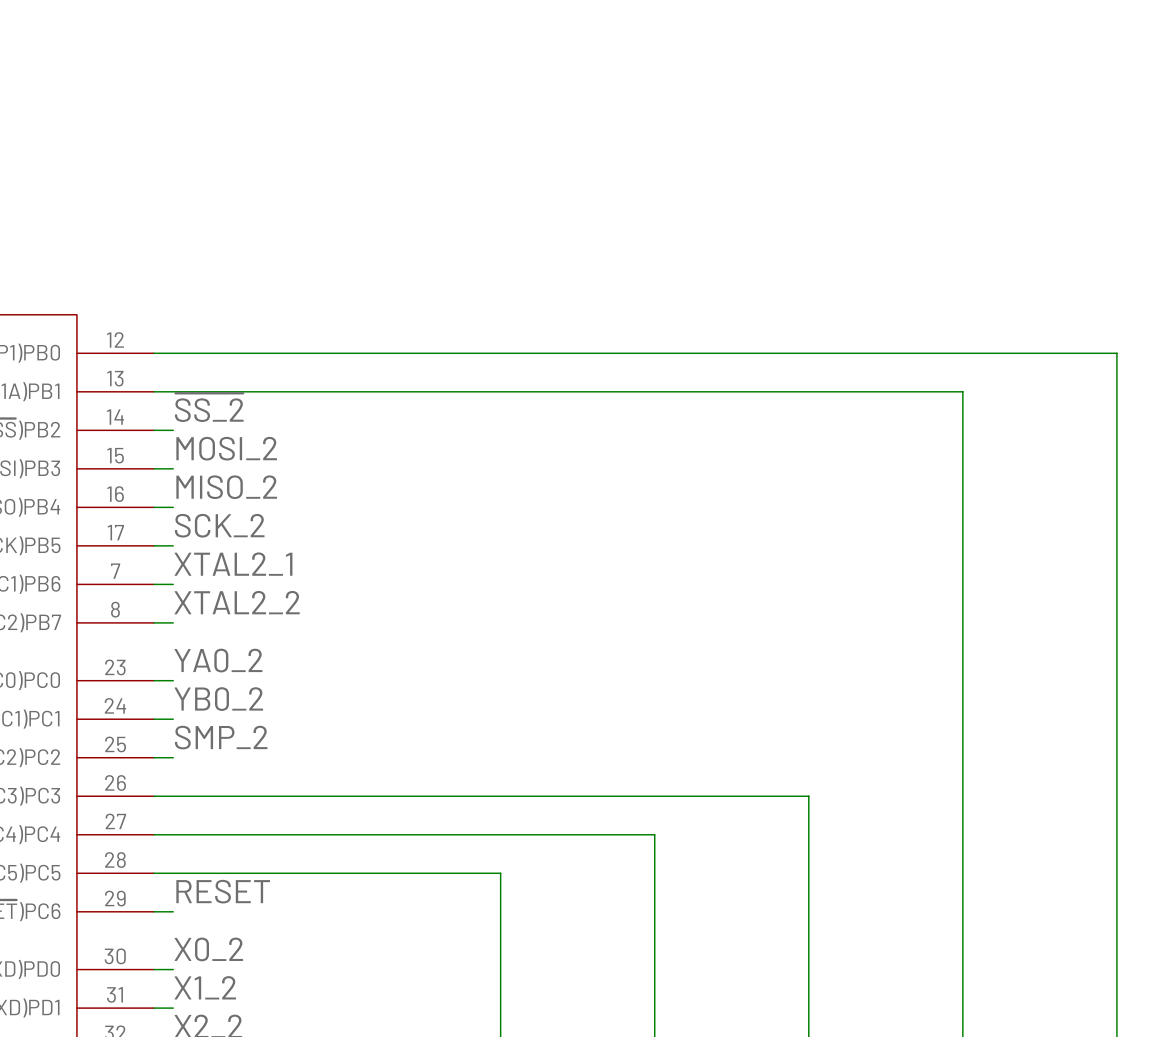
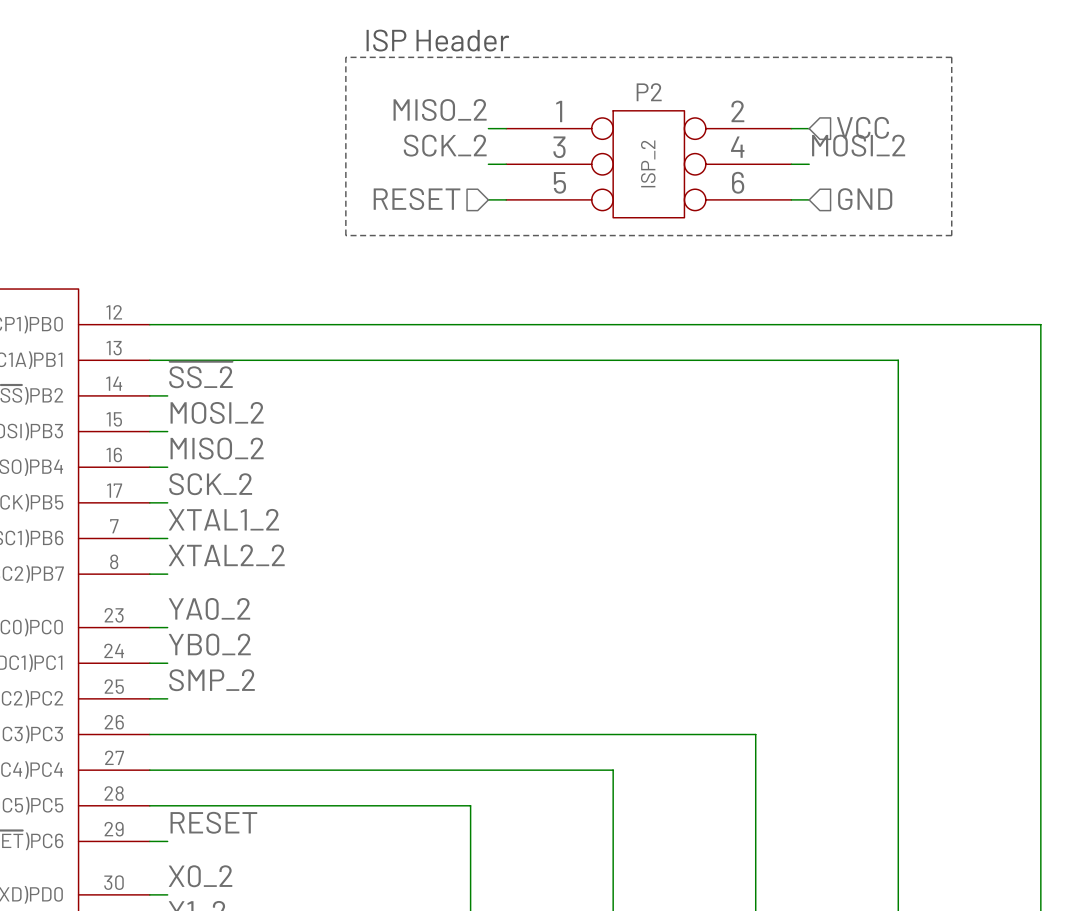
text: none -> ISP Header (437, 40)
line: none -> (345, 57) (951, 57) (951, 235) (345, 235) (345, 57)
label: none -> MISO_2 (440, 109)
hierarchical label: none -> VCC (862, 127)
wire: none -> (488, 128) (506, 128)
wire: none -> (791, 128) (809, 128)
label: none -> SCK_2 (445, 145)
label: none -> MOSI_2 (858, 145)
wire: none -> (488, 164) (506, 164)
P2: none -> ISP_2 (648, 164)
wire: none -> (791, 164) (809, 164)
hierarchical label: none -> RESET (417, 199)
hierarchical label: none -> GND (865, 199)
wire: none -> (488, 199) (506, 199)
wire: none -> (791, 199) (809, 199)
label: XTAL2_1 (233, 564) -> XTAL1_2 (223, 519)

